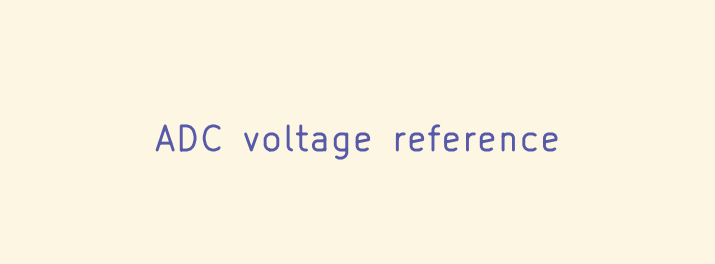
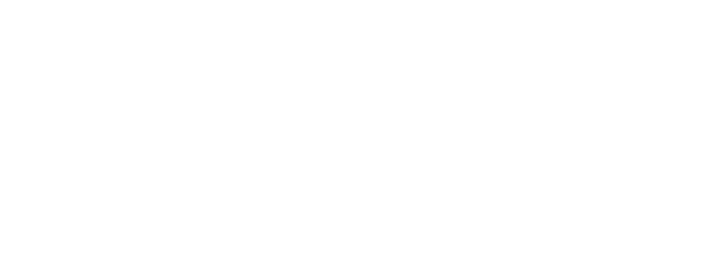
text: ADC voltage reference (356, 141) -> none

